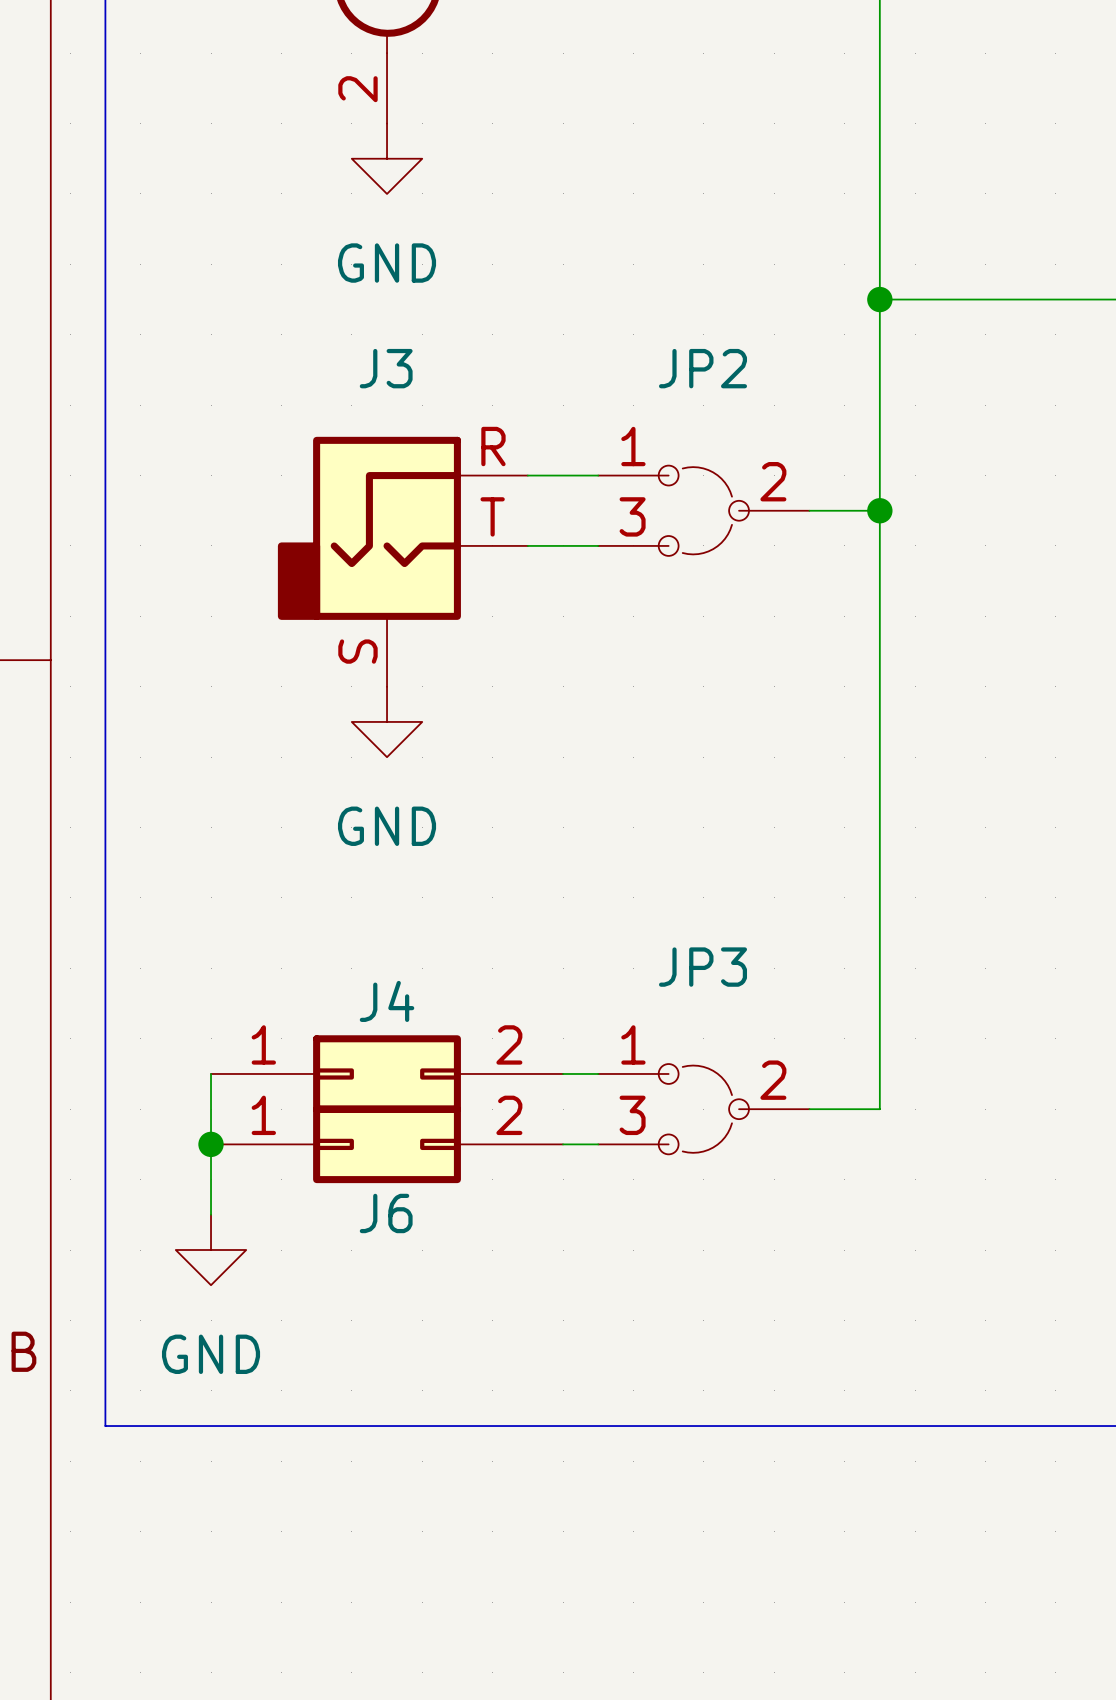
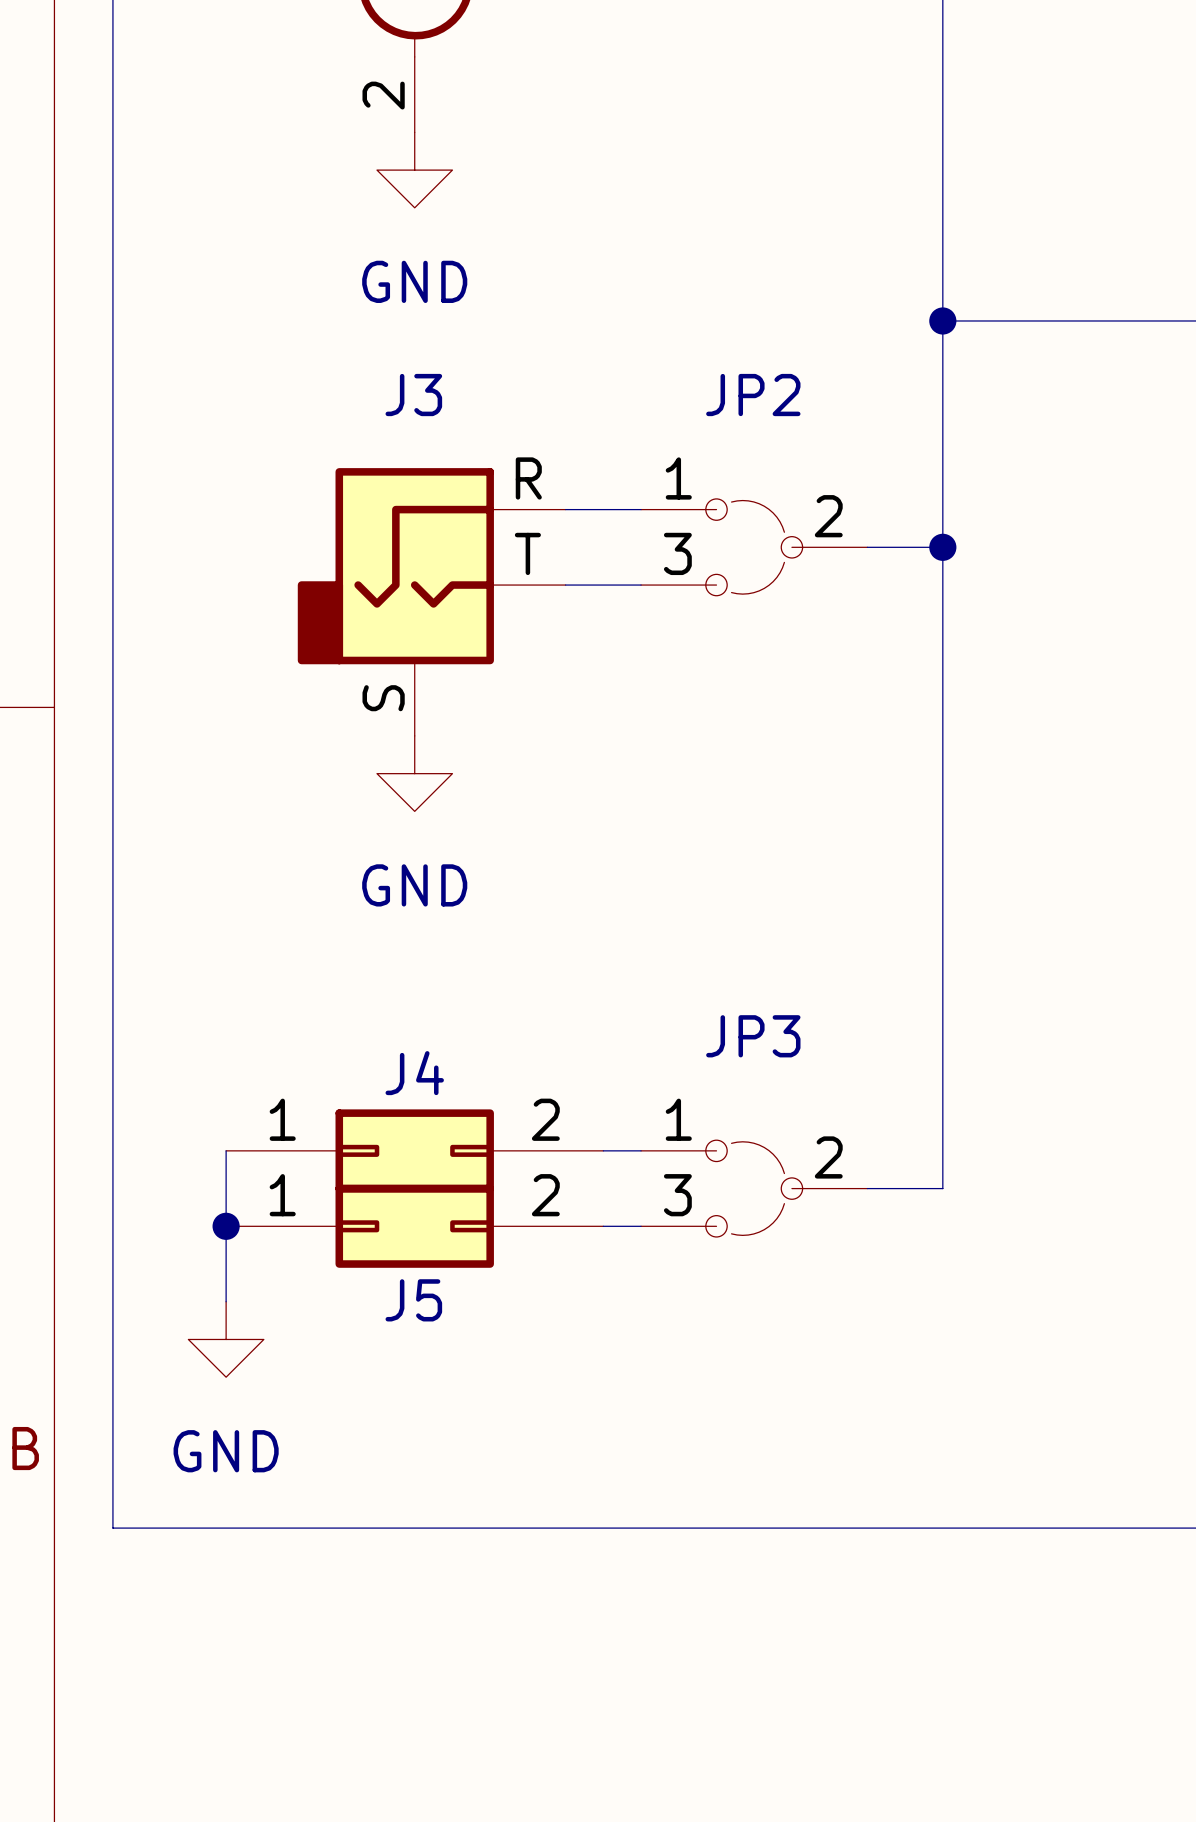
J6 name: J6 (386, 1213) -> J5 (413, 1300)

